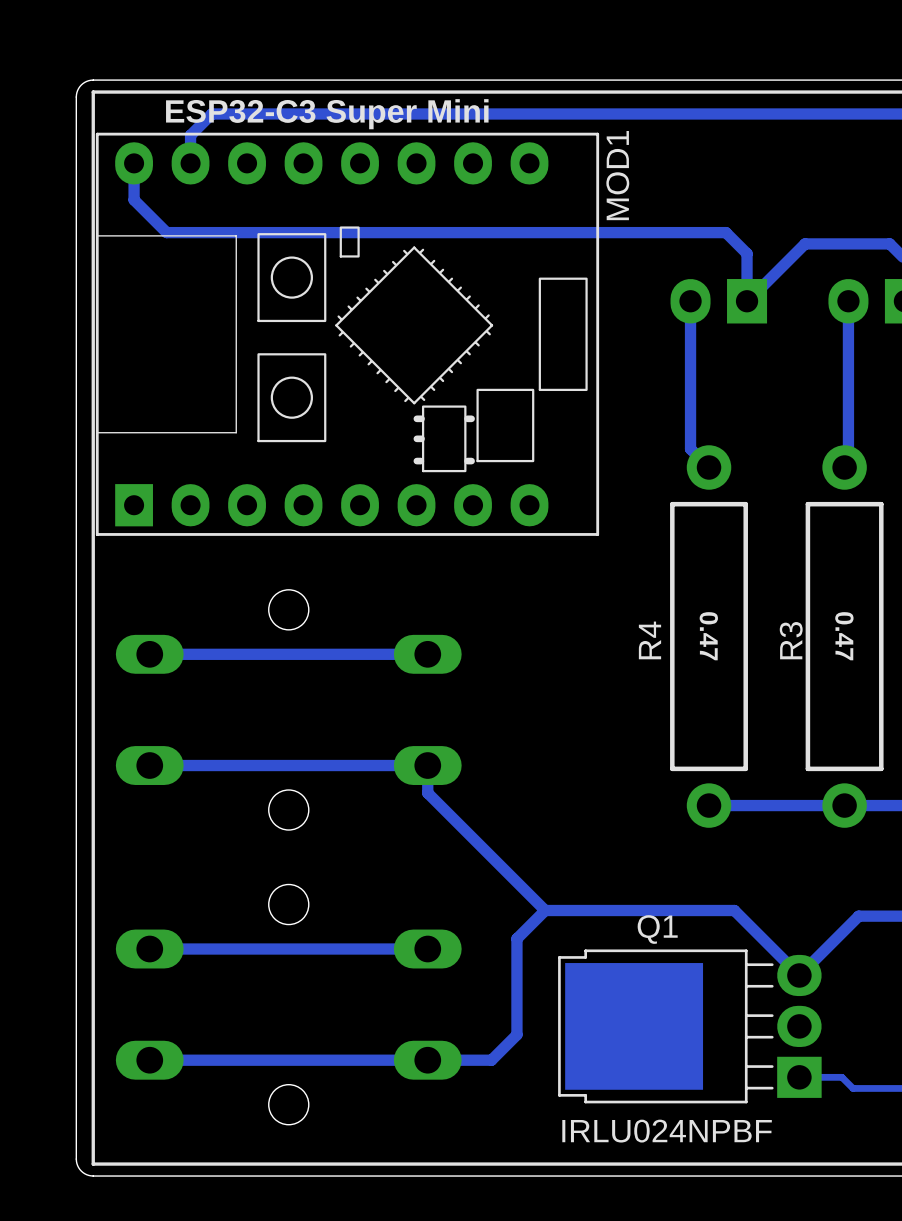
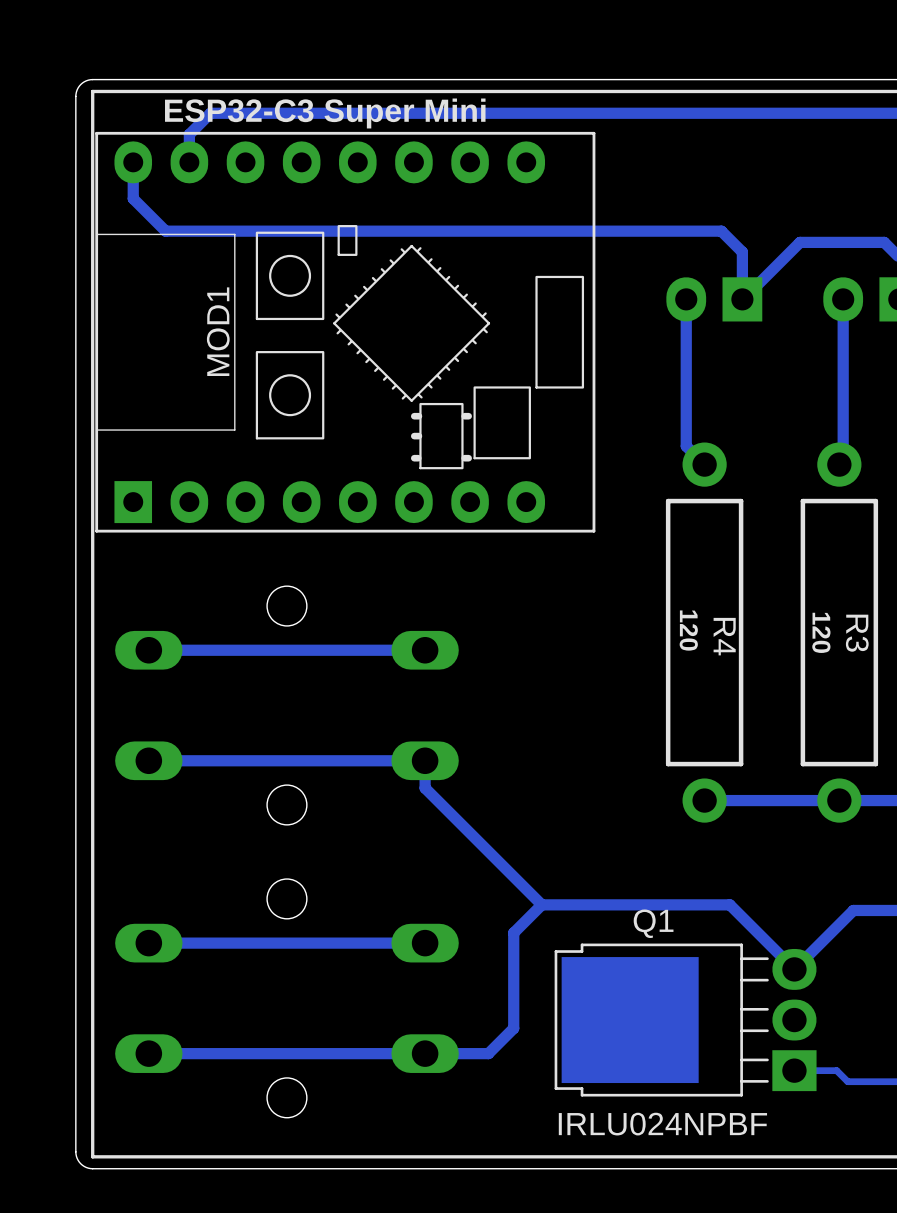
MOD1 name position: MOD1 (617, 175) -> MOD1 (218, 331)
text: none -> 120 (688, 630)
text: 0.47 (708, 636) -> none
text: none -> 120 (821, 632)
text: 0.47 (844, 636) -> none
R4 name rotation: 0° (649, 640) -> 180° (724, 636)
R4 name position: R4 (649, 640) -> R4 (724, 636)
R3 name rotation: 0° (791, 640) -> 180° (857, 633)
R3 name position: R3 (791, 640) -> R3 (857, 633)

